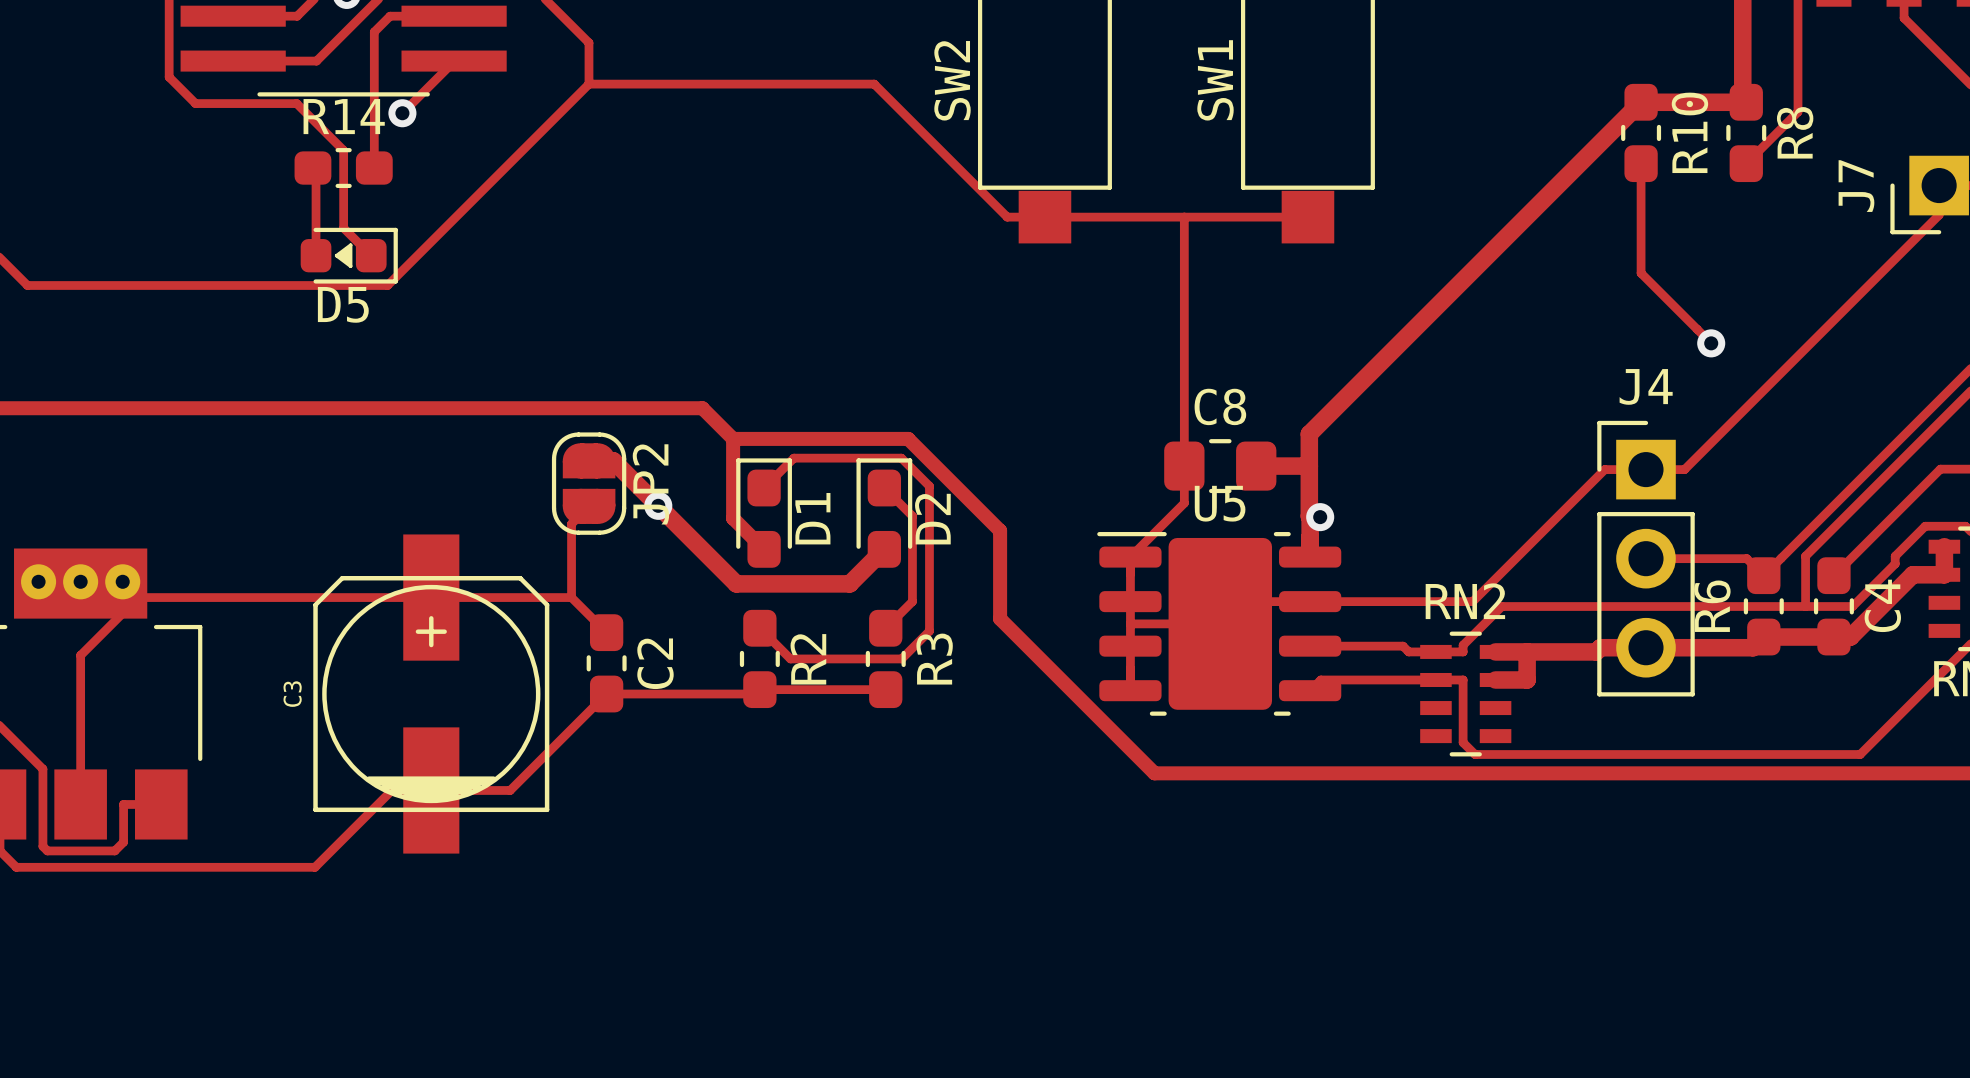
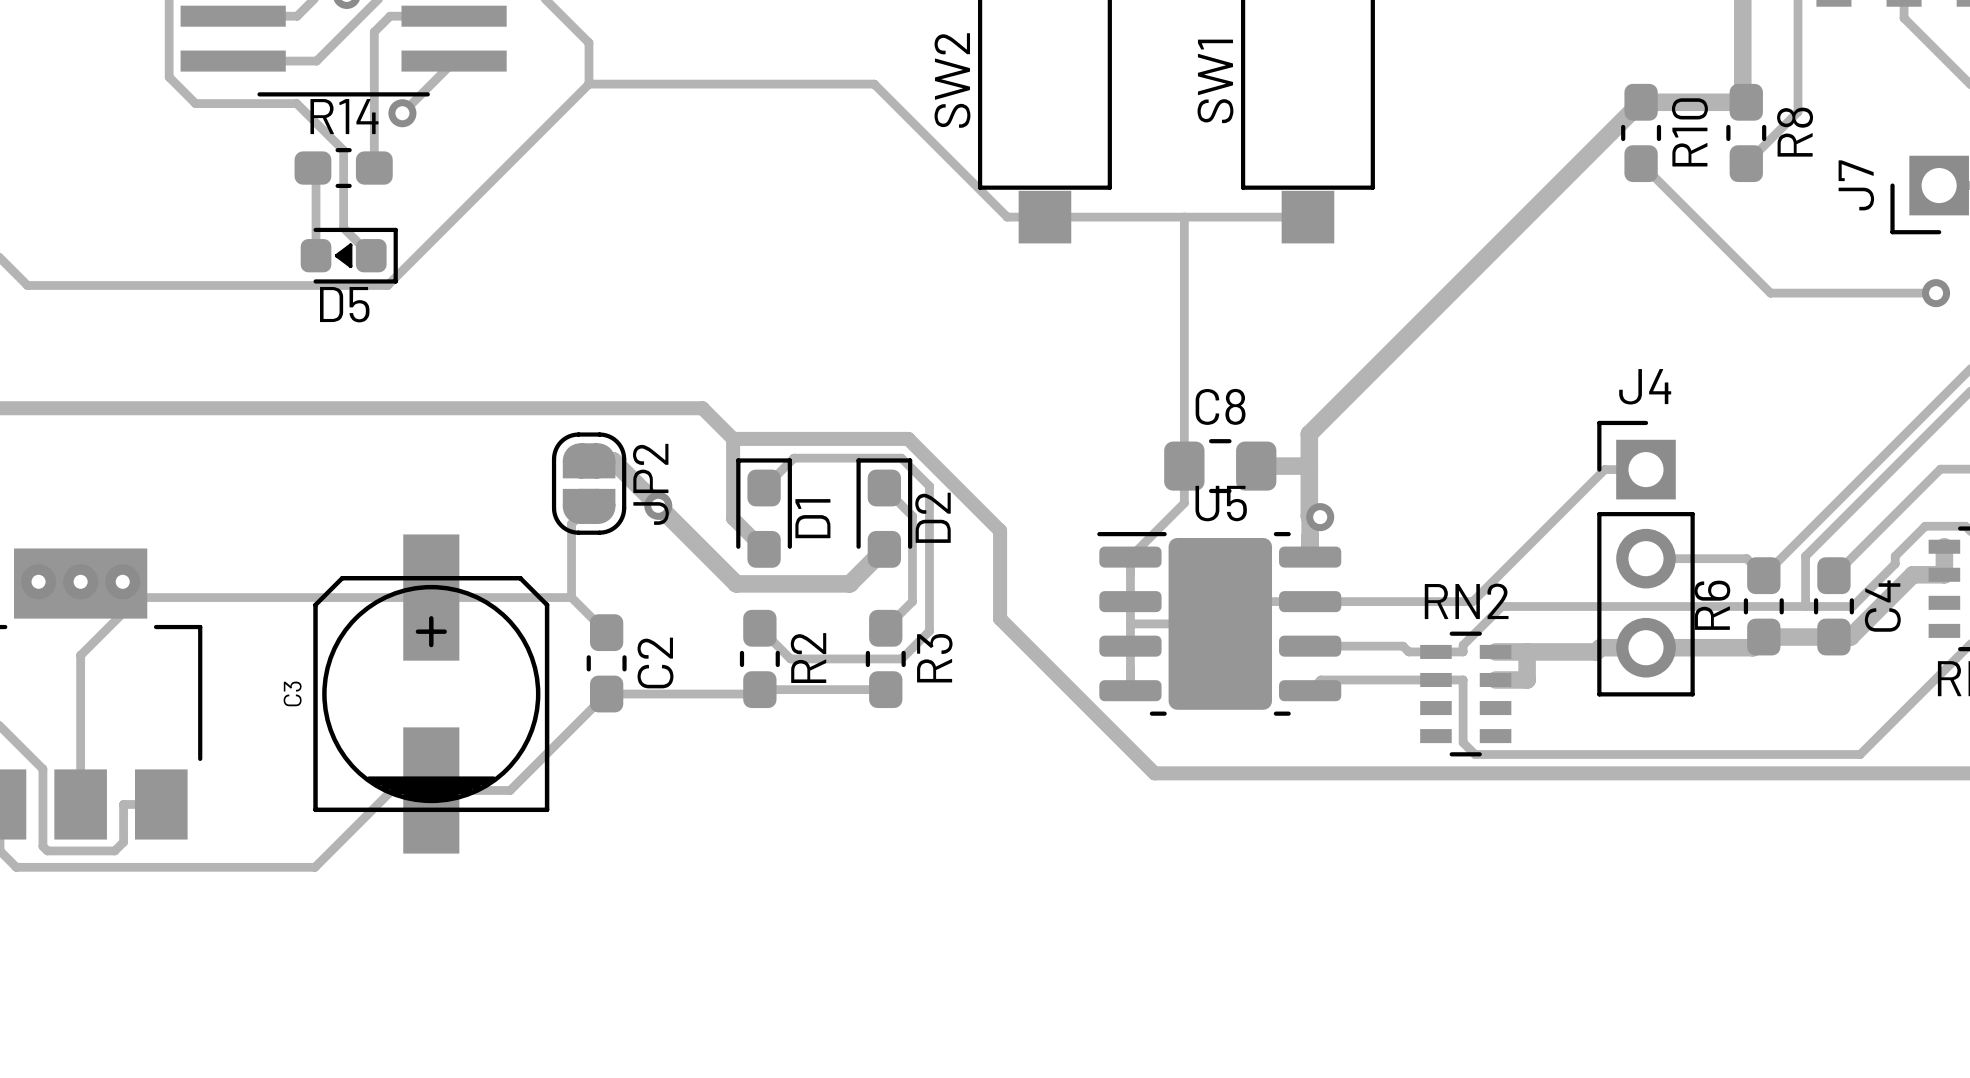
track: (1641, 163) (1641, 273) (1711, 343) -> (1641, 163) (1770, 293) (1936, 293)
track: (1939, 185) (1939, 215) (1684, 469) (1645, 469) -> none
via: none -> (1936, 293)
via: (1711, 343) -> none

